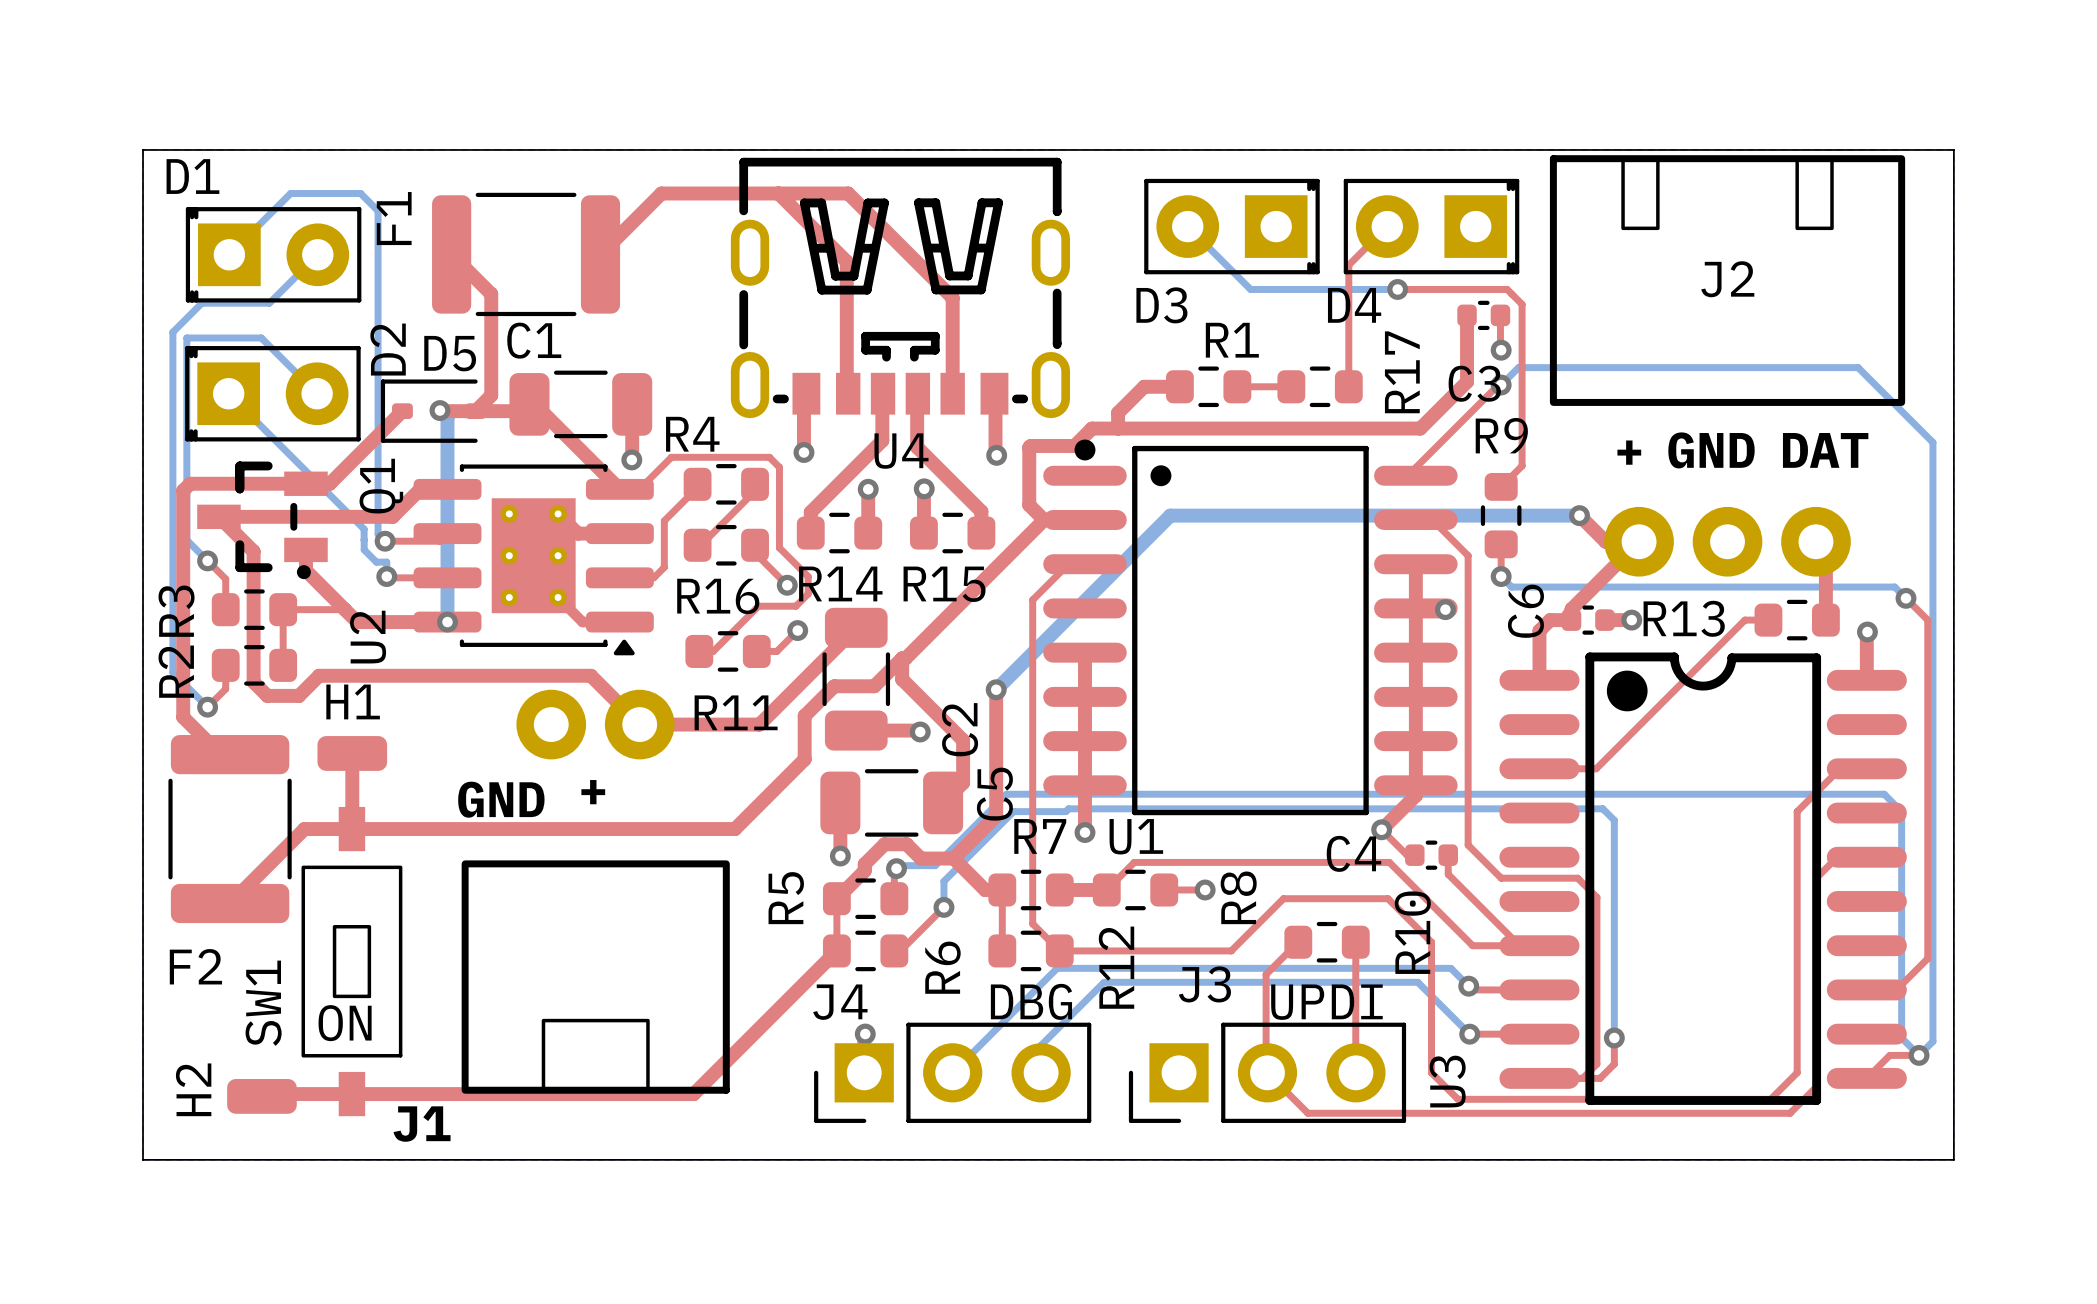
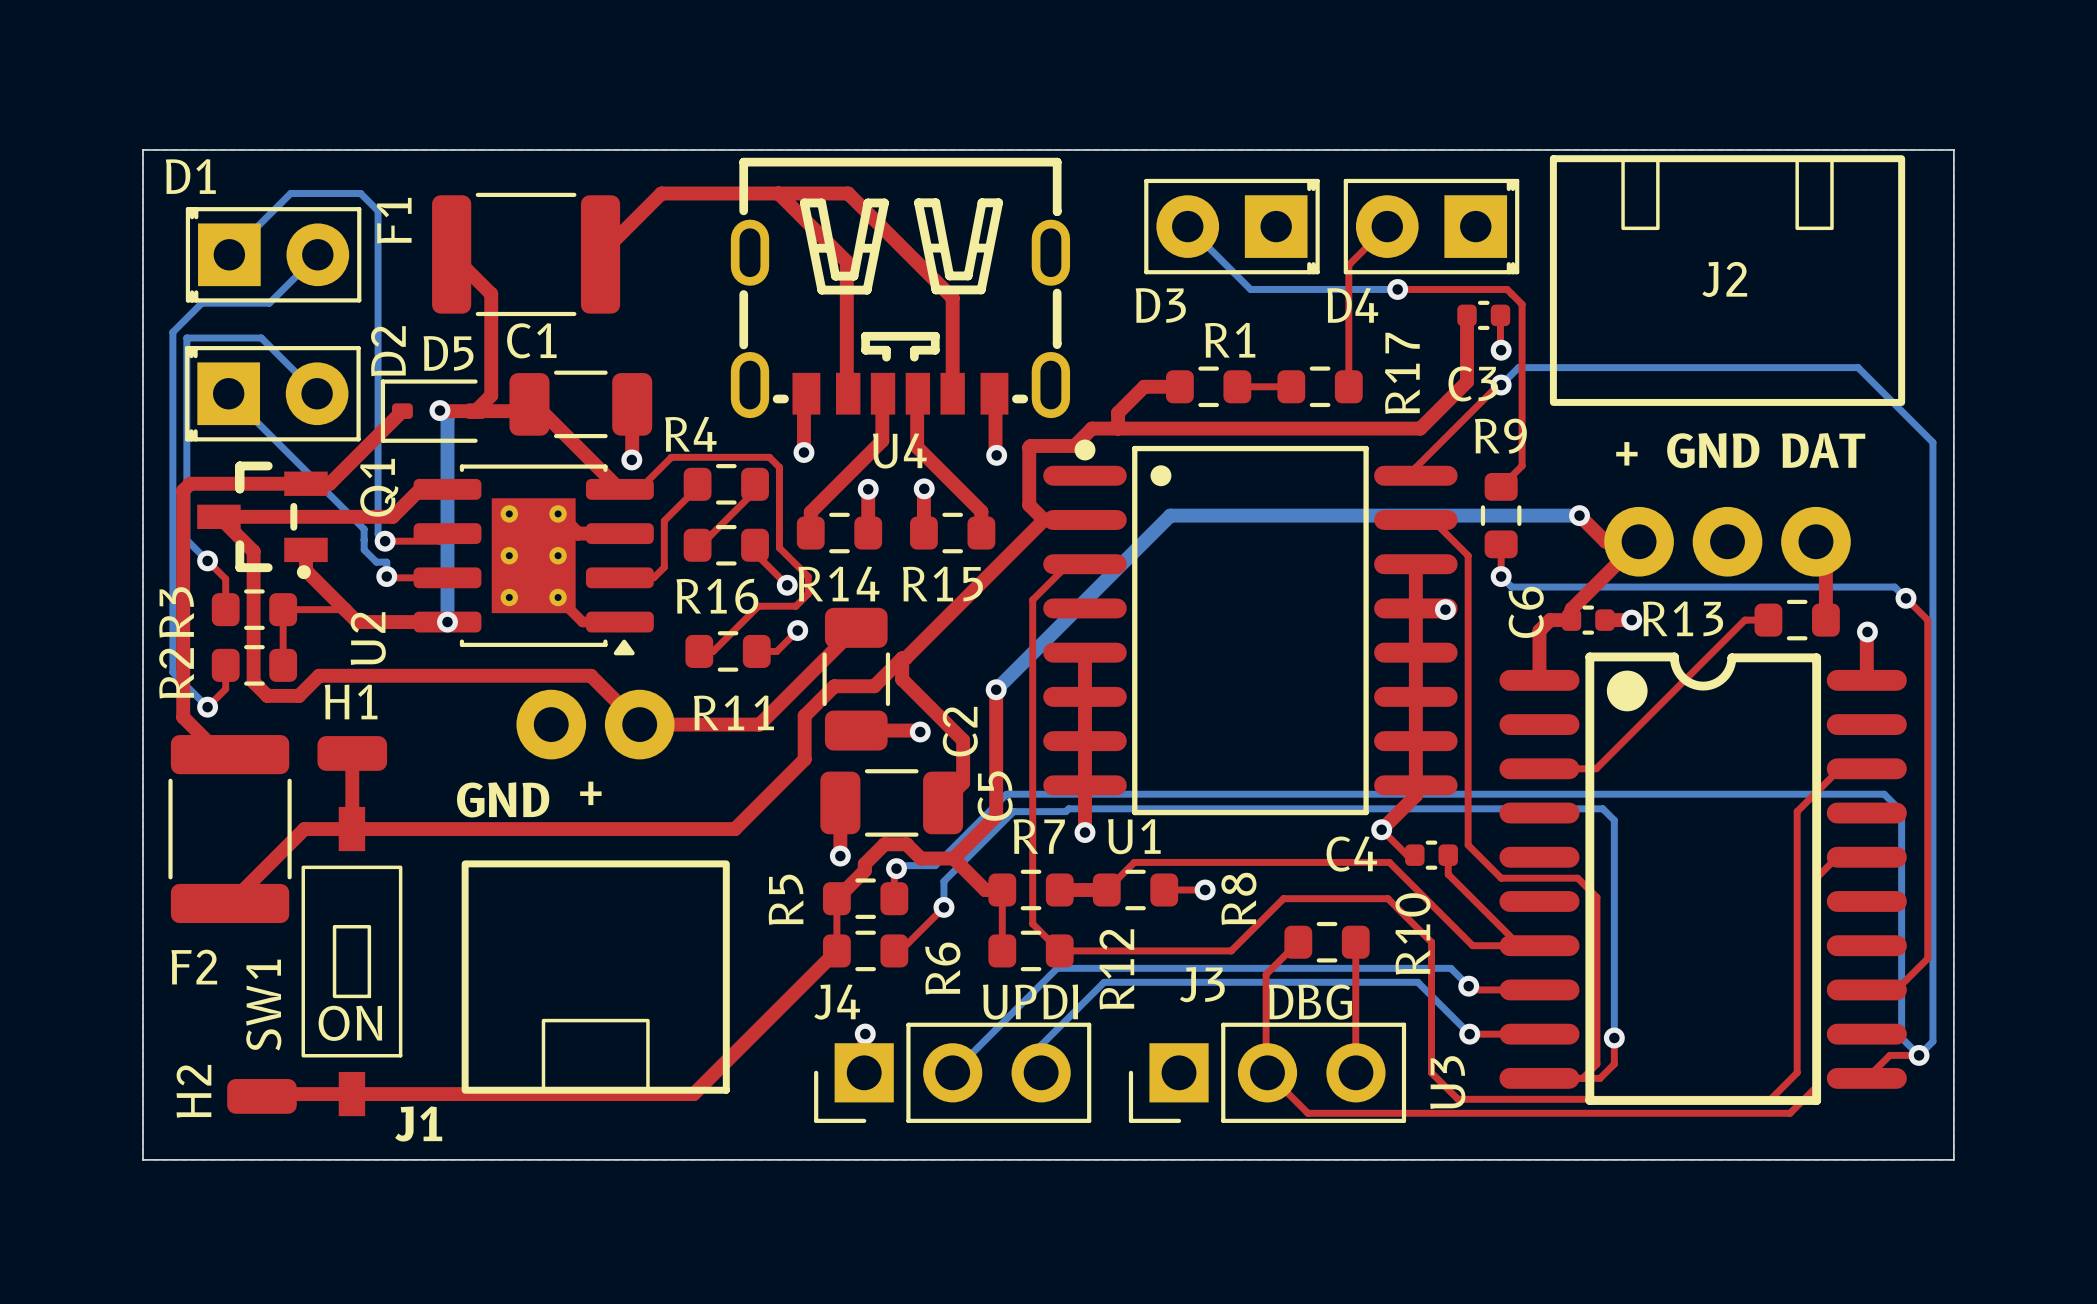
text: DBG (1031, 1001) -> UPDI (1030, 1002)
text: UPDI (1326, 1002) -> DBG (1310, 1002)

